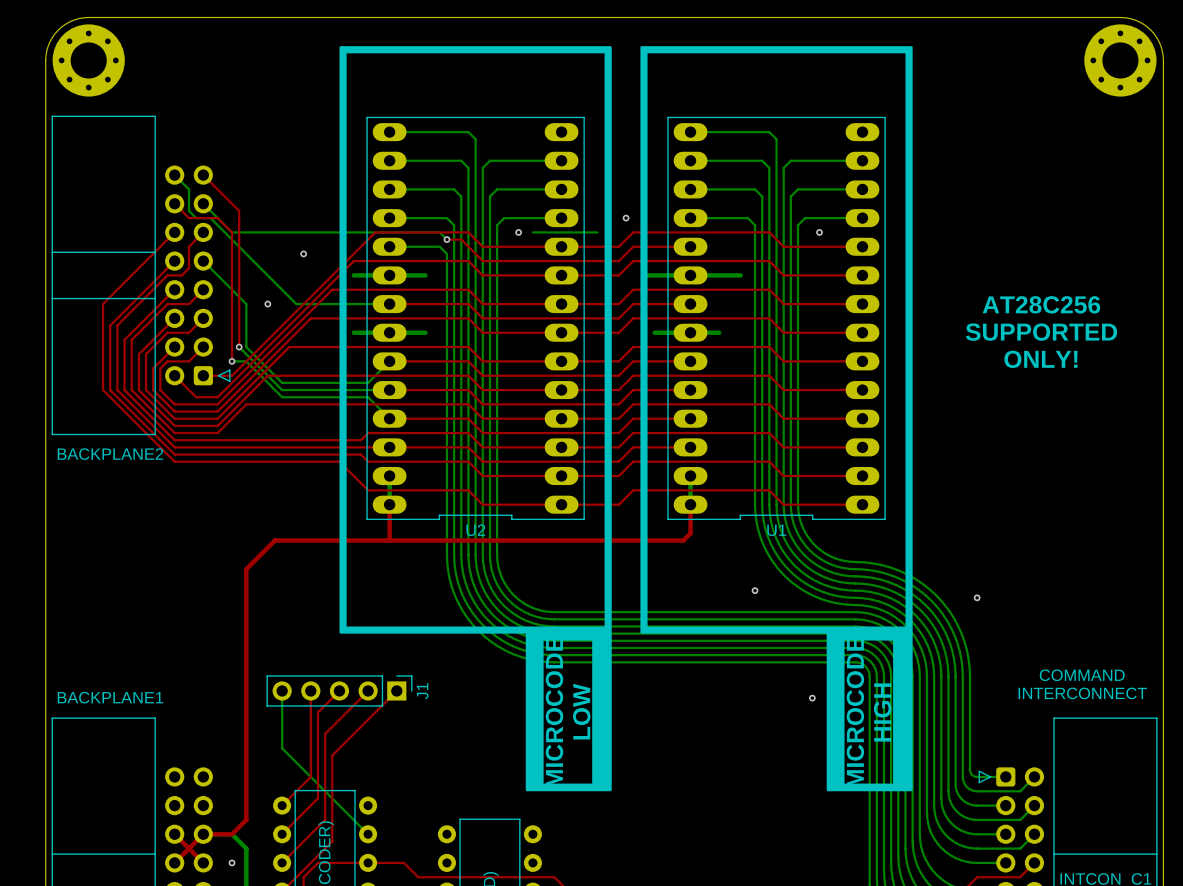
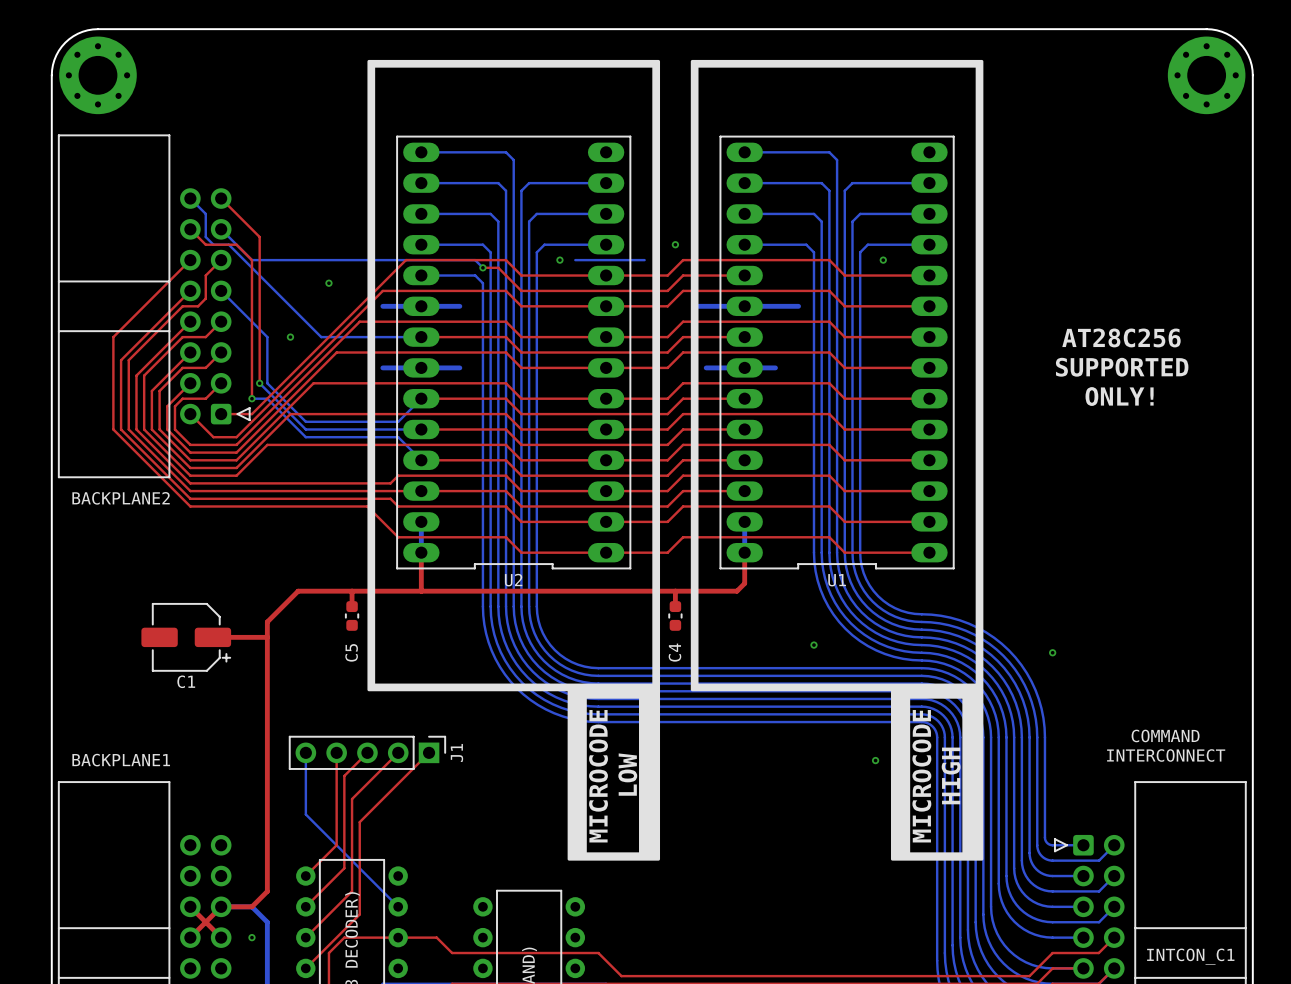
top track: none -> (352, 591) (352, 606)
top track: none -> (675, 591) (675, 606)
C5: none -> (352, 615)
C4: none -> (675, 615)
C1: none -> (186, 637)
top track: none -> (212, 637) (267, 637)

